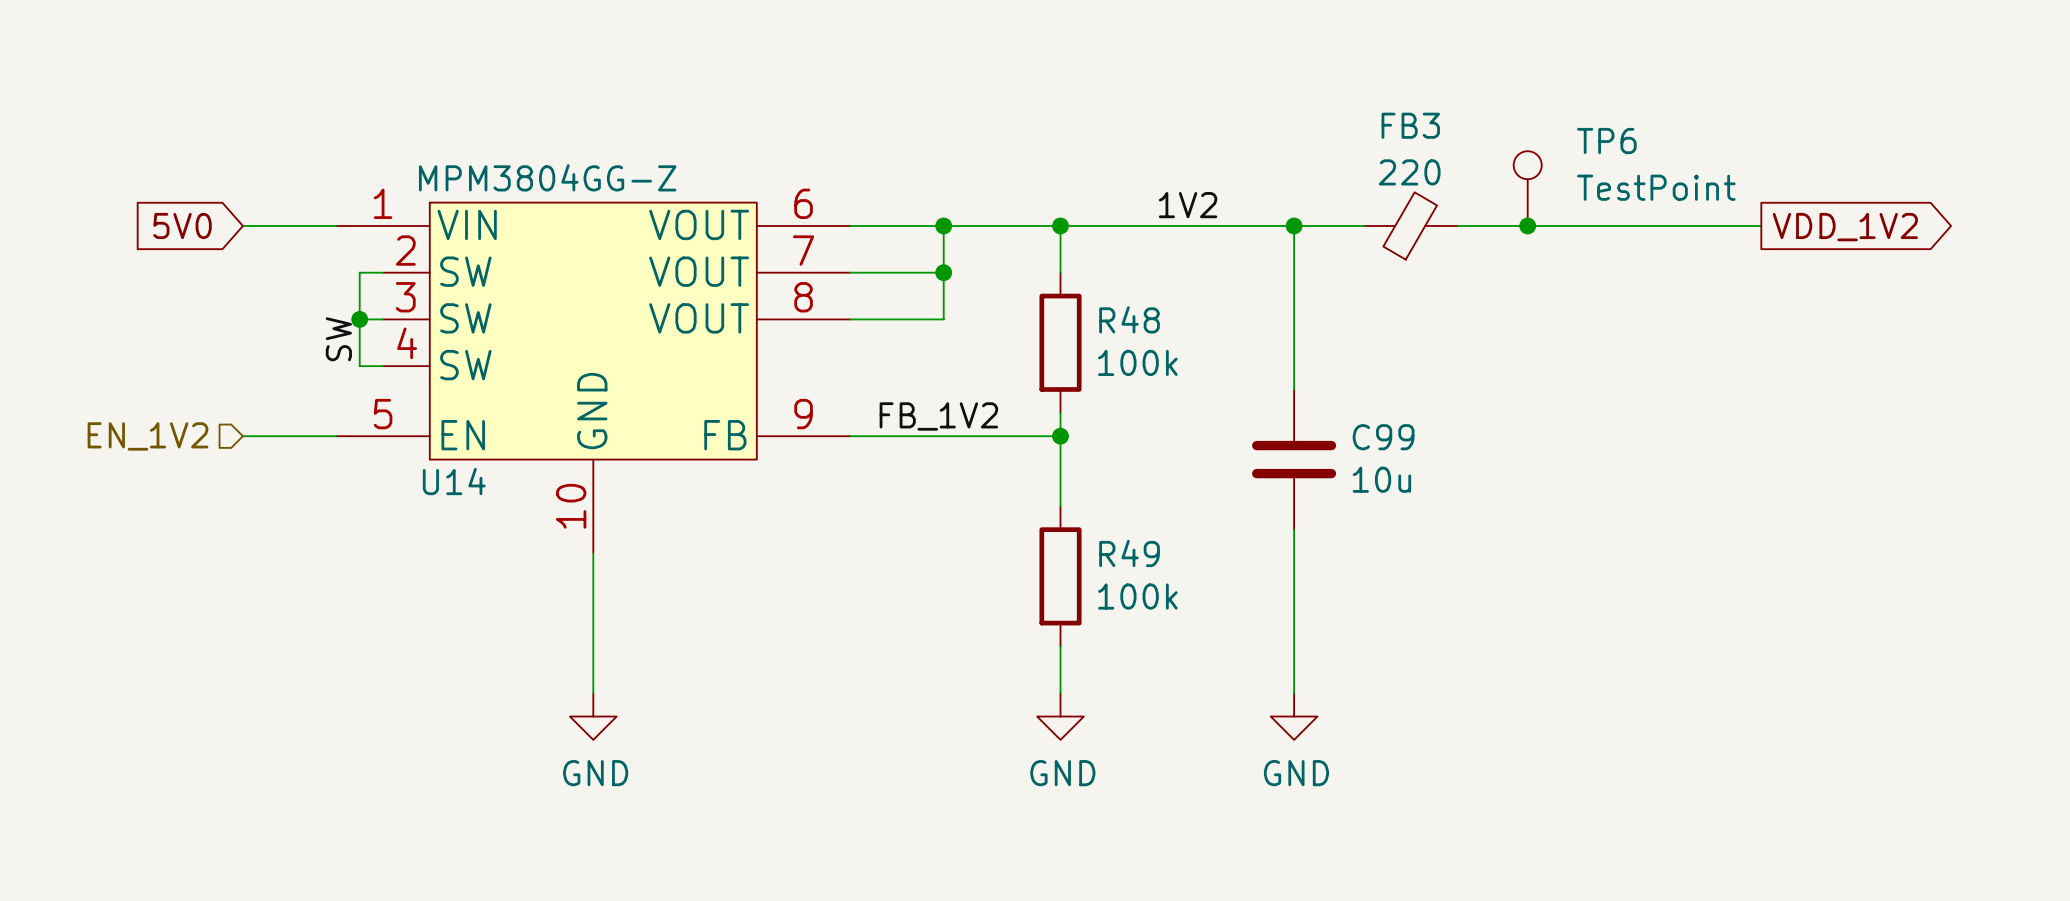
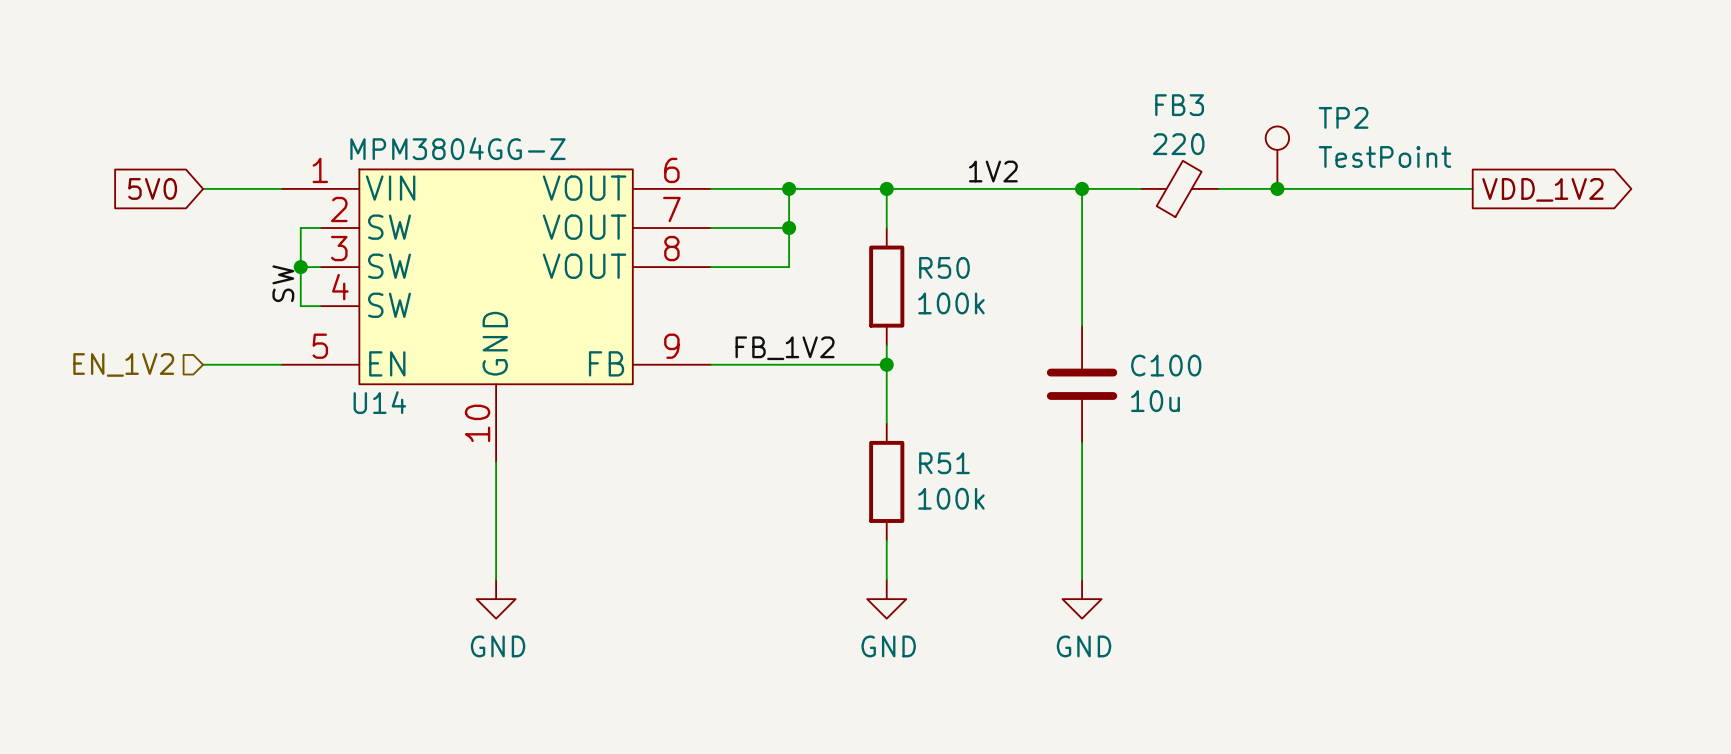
TP6 name: TP6 (1606, 141) -> TP2 (1343, 117)
R48 name: R48 (1129, 319) -> R50 (944, 267)
C99 name: C99 (1383, 437) -> C100 (1166, 365)
R49 name: R49 (1129, 553) -> R51 (944, 463)

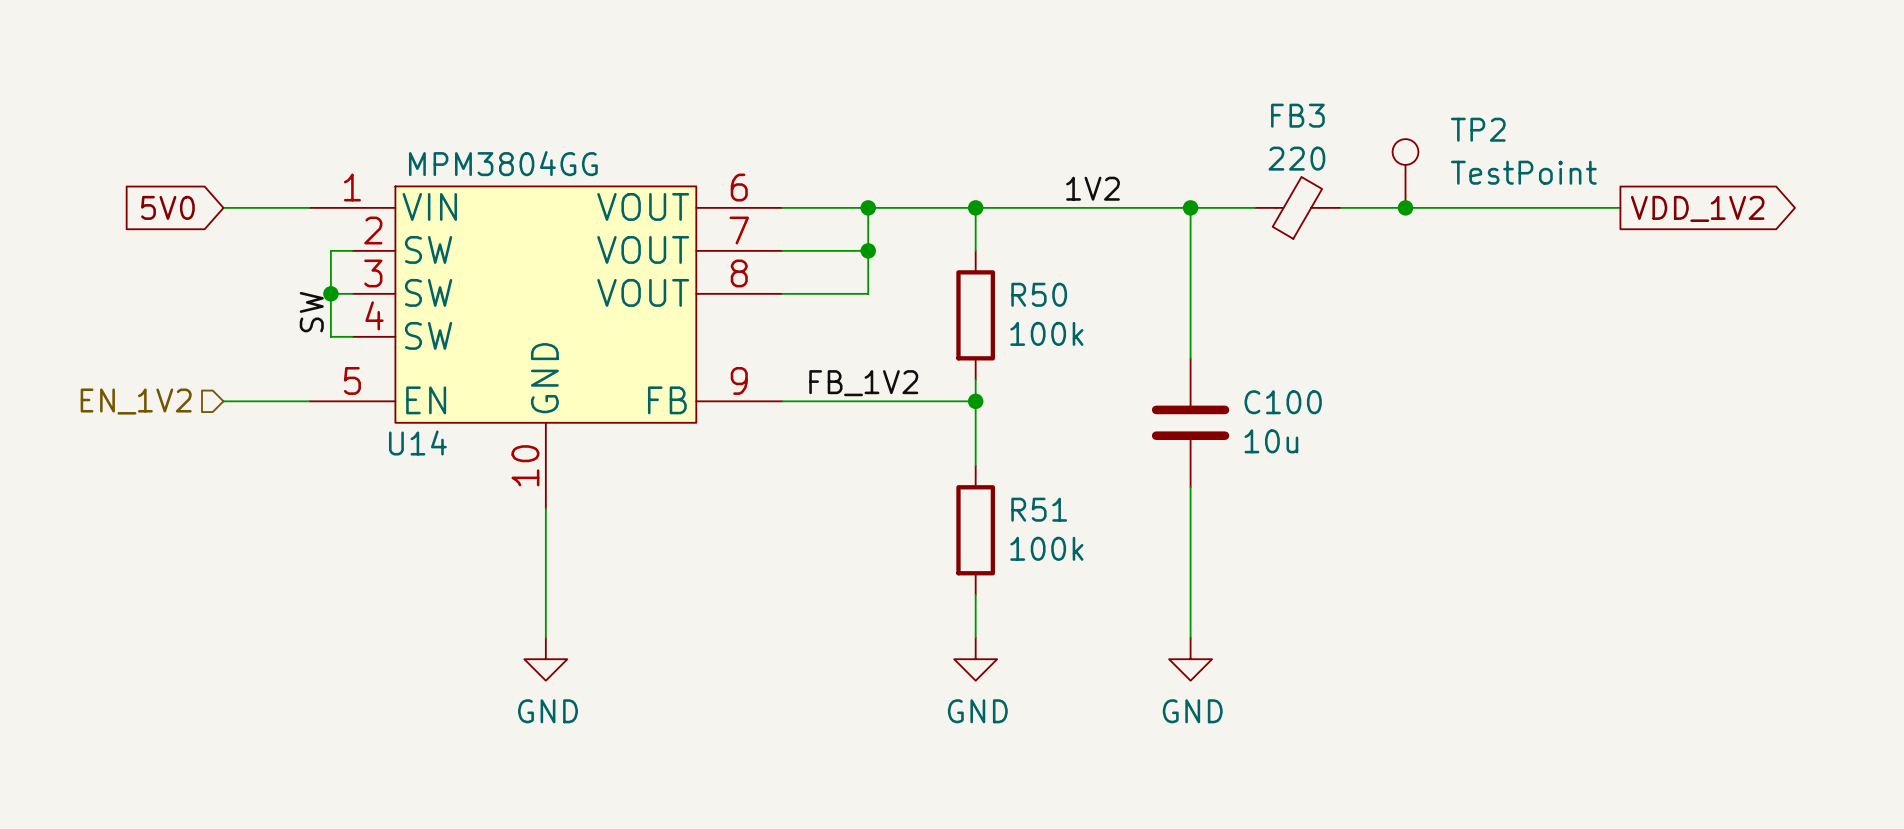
U14 value: MPM3804GG-Z (457, 148) -> MPM3804GG (503, 163)

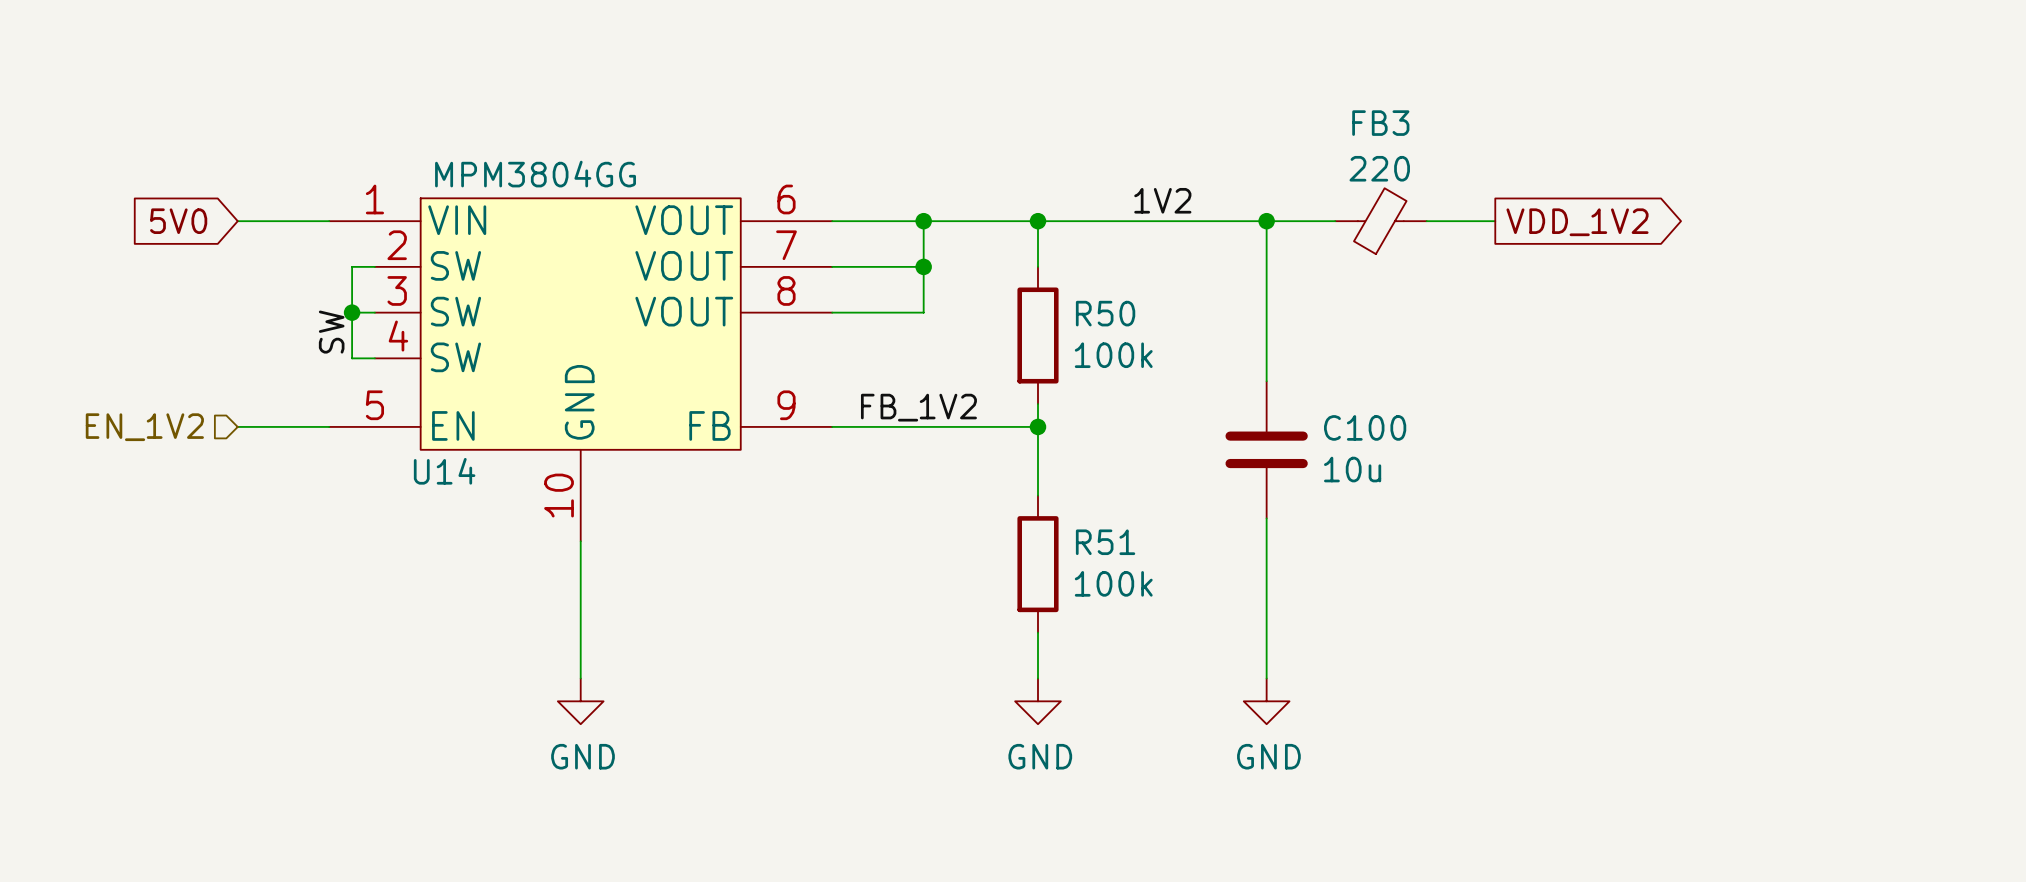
TP2: TestPoint (1405, 173) -> none
wire: (1405, 207) (1620, 207) -> none
junction: (1405, 207) -> none
global label position: VDD_1V2 (1697, 208) -> VDD_1V2 (1577, 222)

